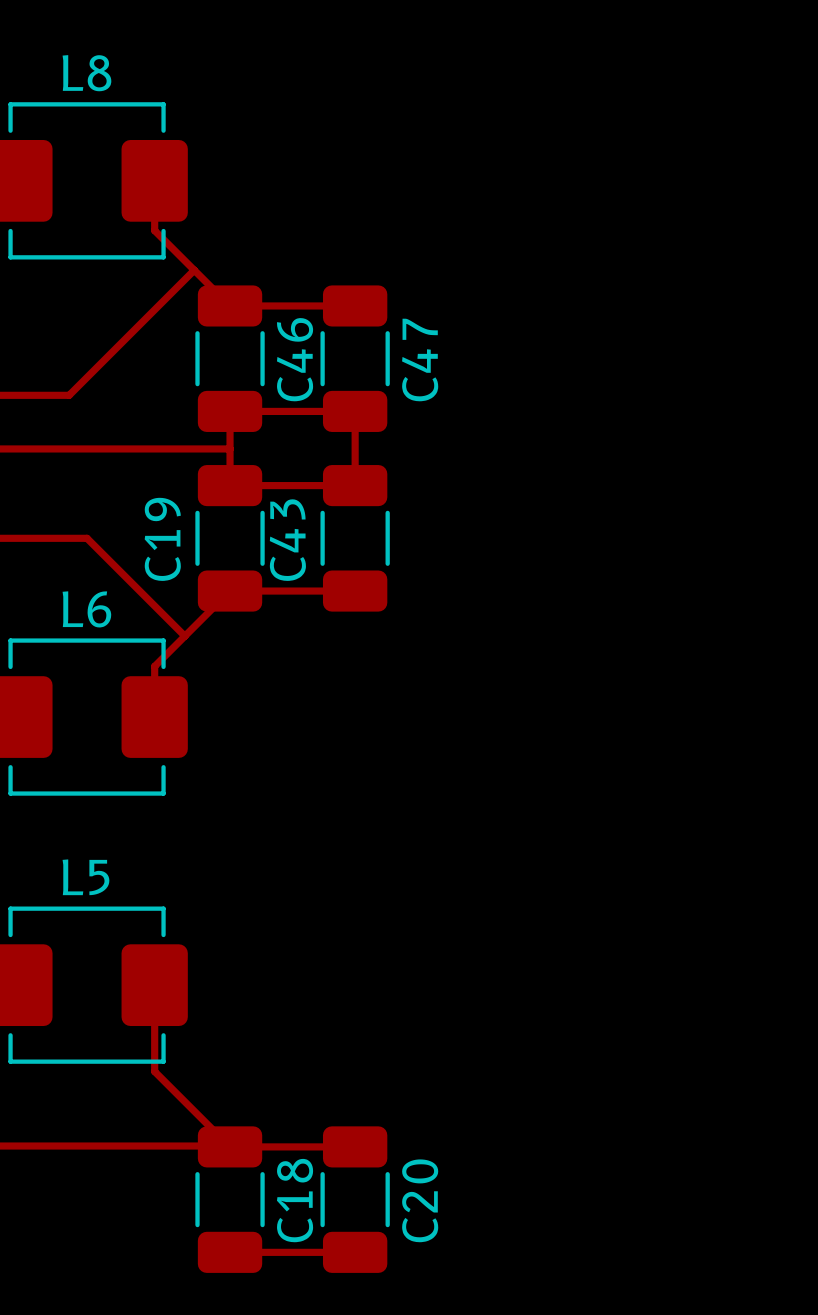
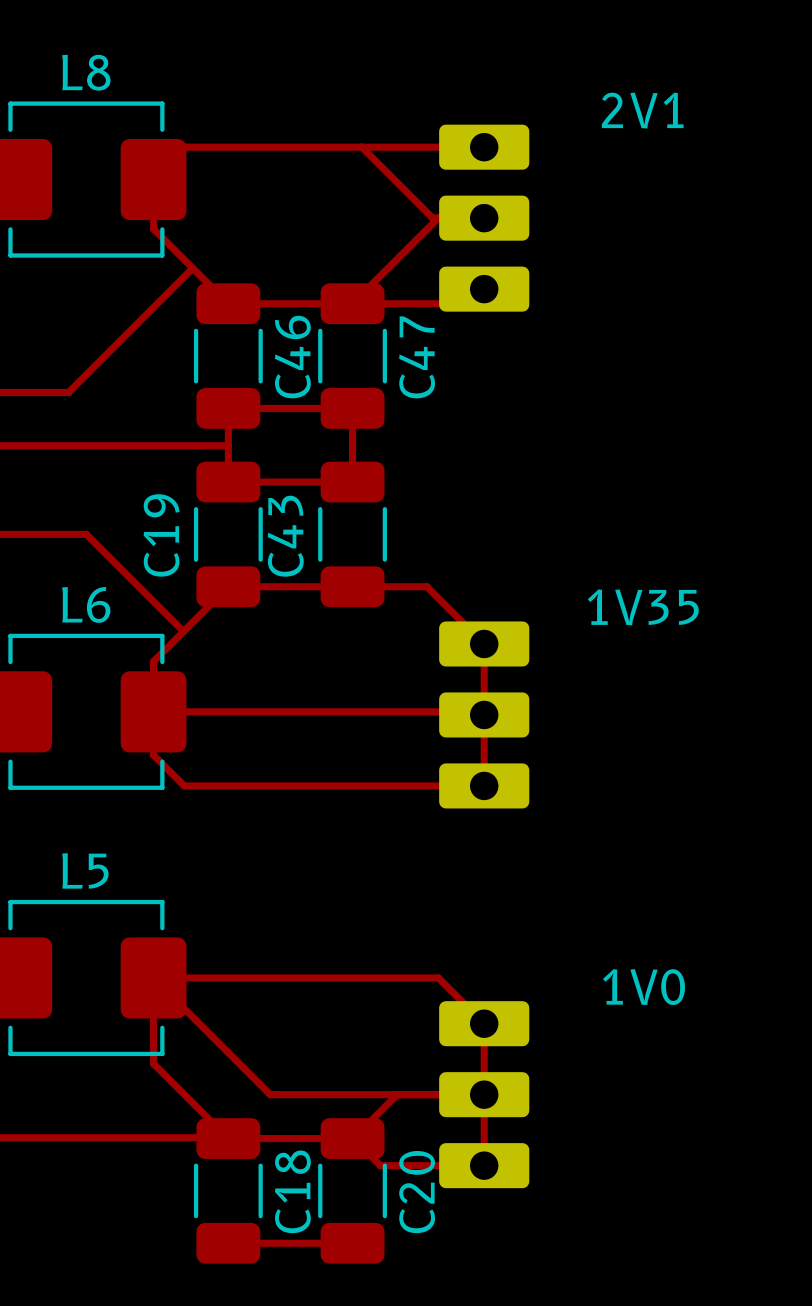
track: none -> (361, 147) (432, 218) (484, 218)
track: none -> (484, 147) (185, 147) (153, 179)
track: none -> (438, 218) (352, 303) (469, 303) (484, 289)
2V1: none -> (484, 218)
track: none -> (352, 586) (426, 586) (484, 643) (484, 785) (184, 785) (153, 755) (153, 711) (481, 711) (484, 714)
1V35: none -> (484, 714)
track: none -> (397, 1094) (353, 1138) (380, 1165) (484, 1165) (484, 1023) (438, 977) (153, 977) (270, 1094) (484, 1094)
1V0: none -> (484, 1094)

